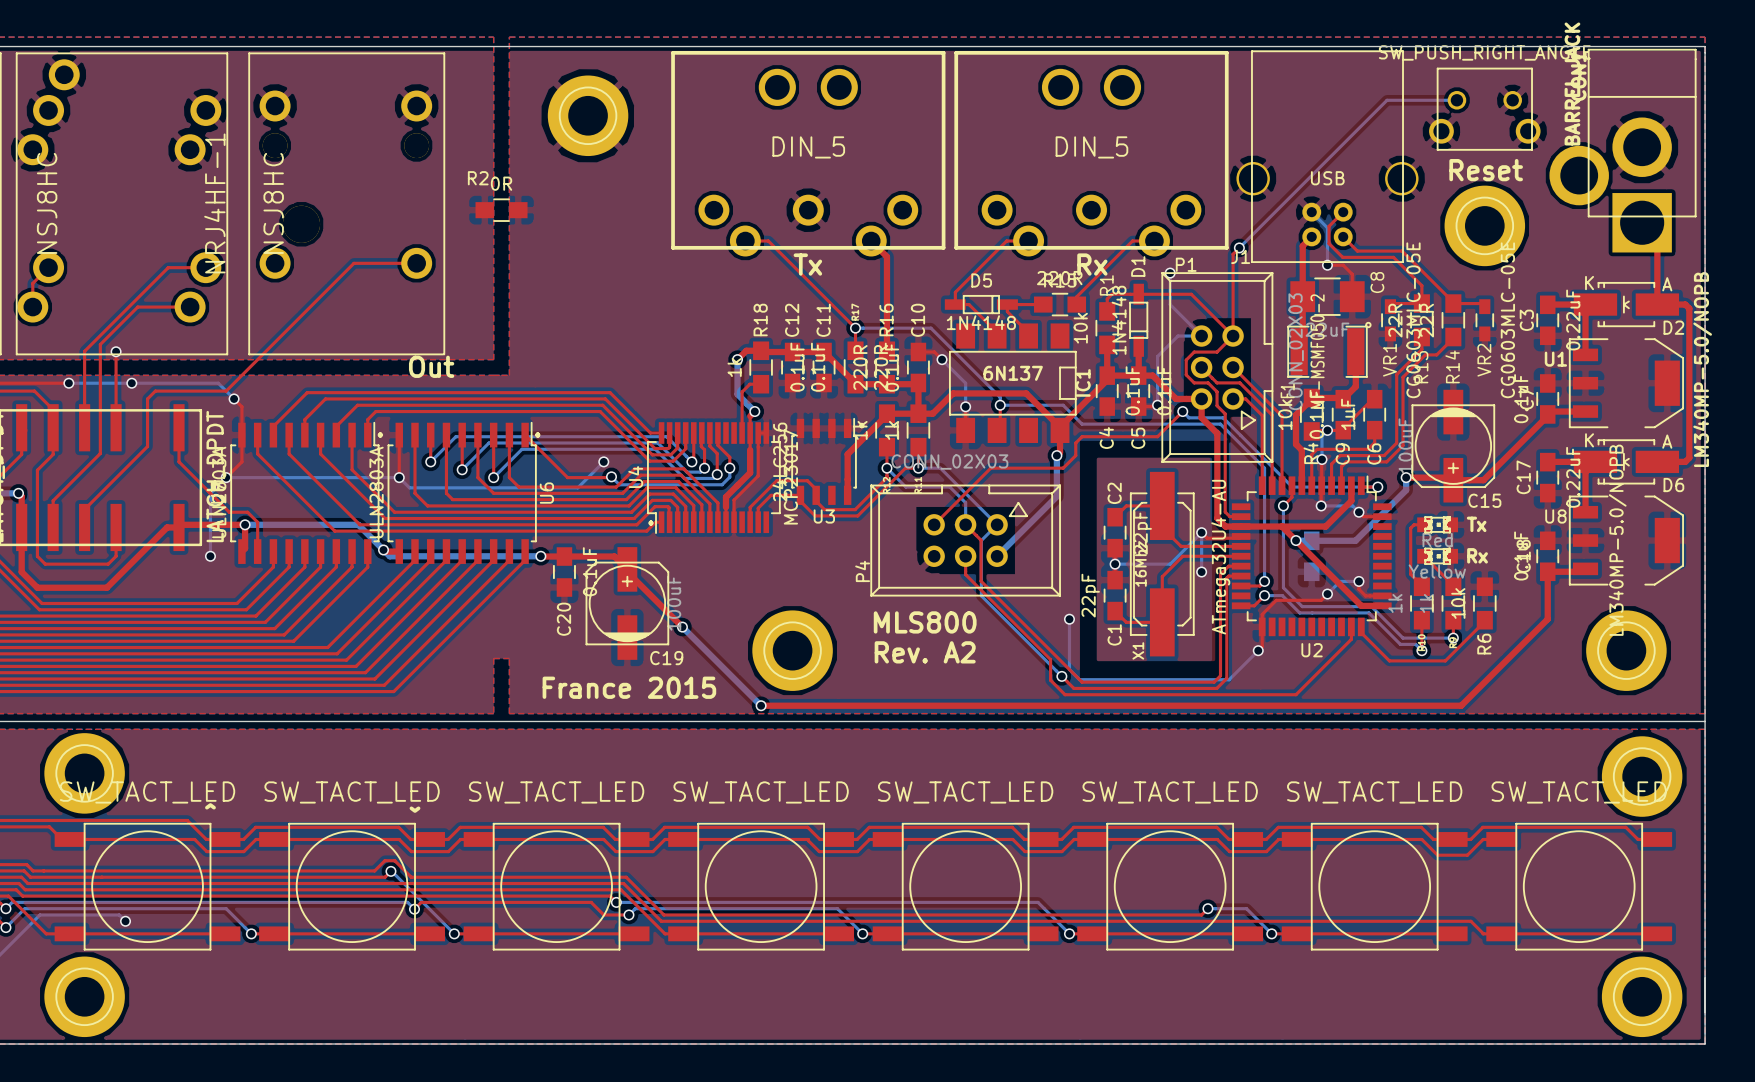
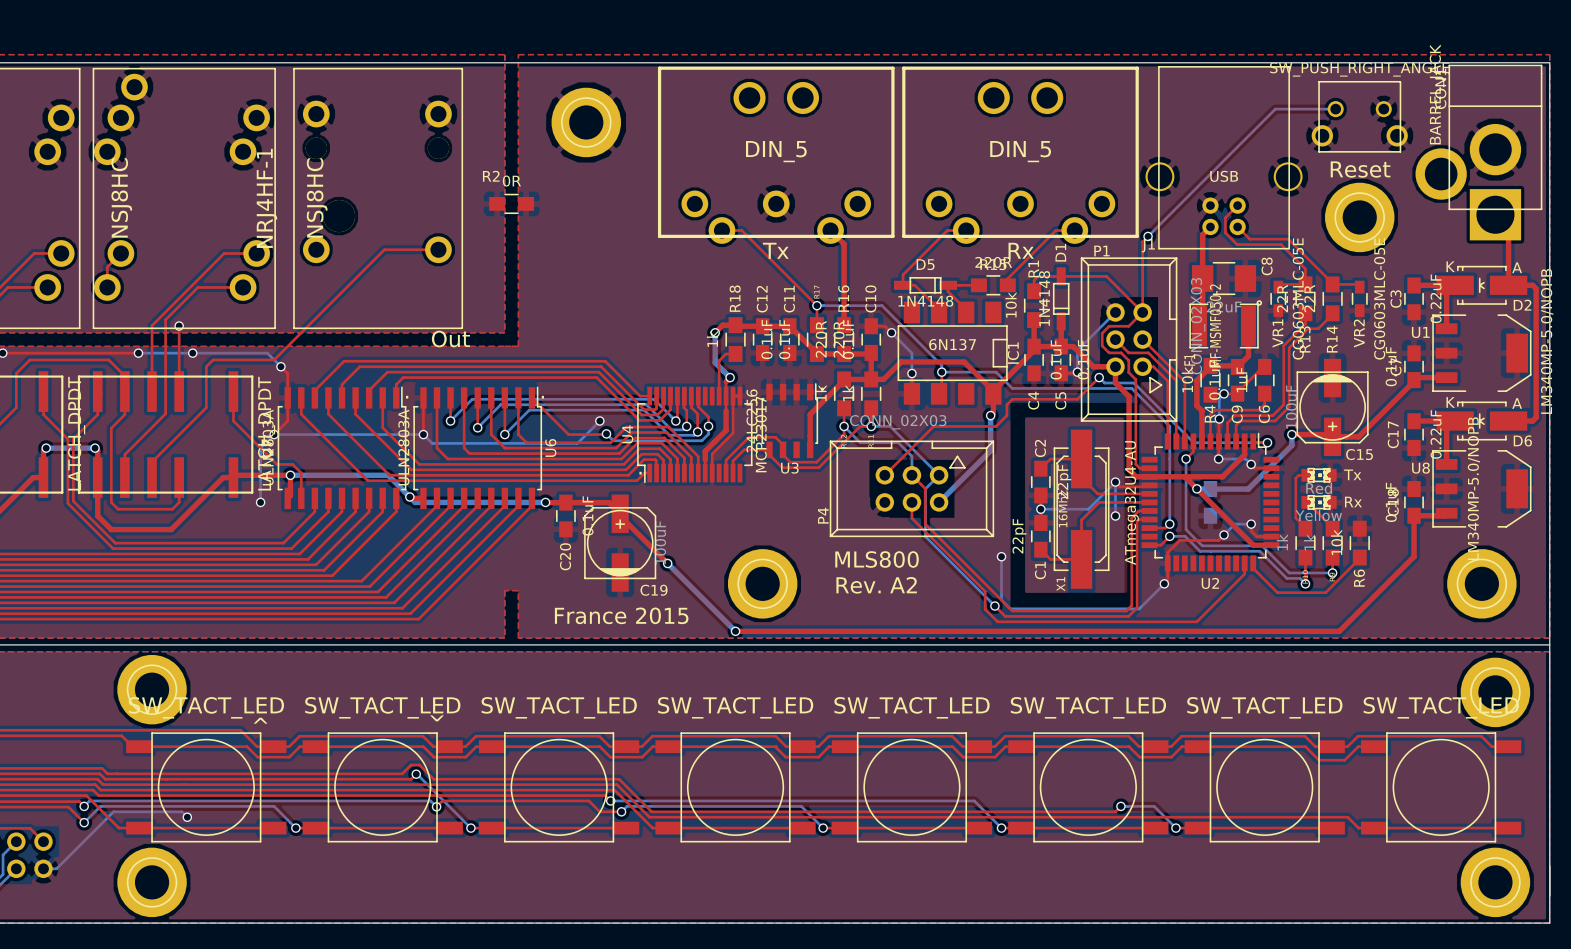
bottom track: (1311, 212) (1327, 227) (1327, 265) -> none
top track: (1327, 265) (1343, 265) (1352, 274) (1352, 296) -> none
via: (1327, 265) -> none
bottom track: (1170, 273) (1170, 304) (1201, 336) (1178, 336) (1157, 356) (1157, 380) -> (1115, 312) (1077, 350)
via: (1170, 273) -> none

